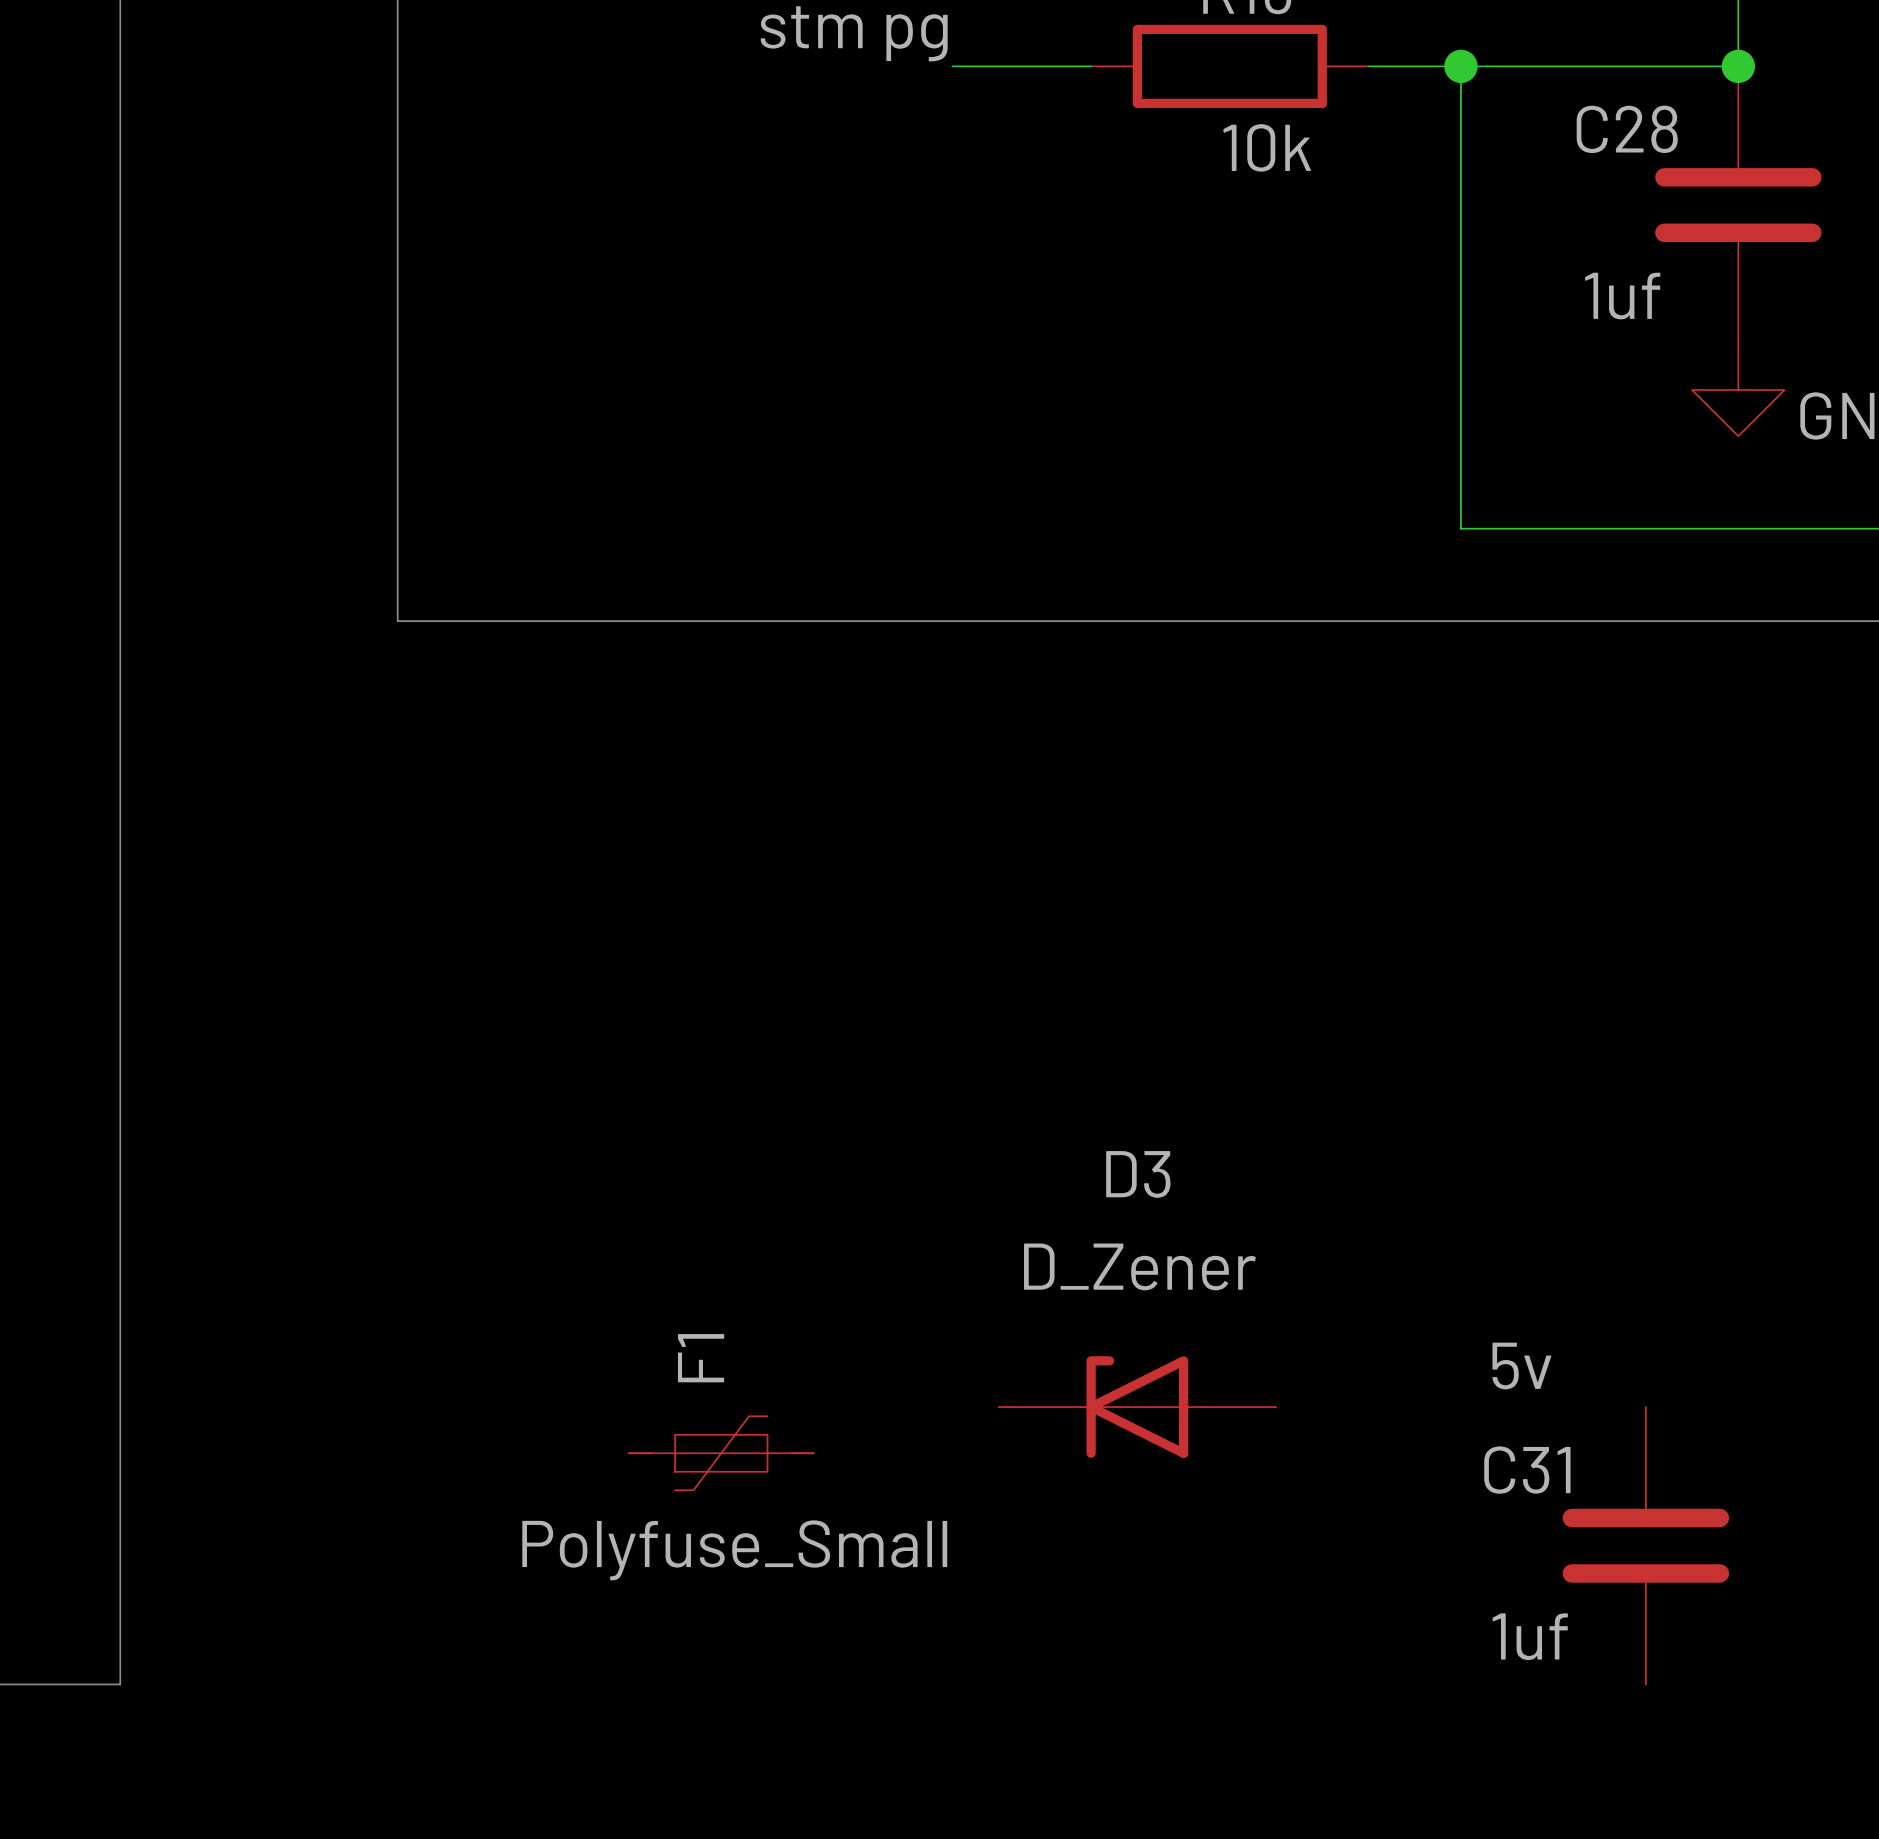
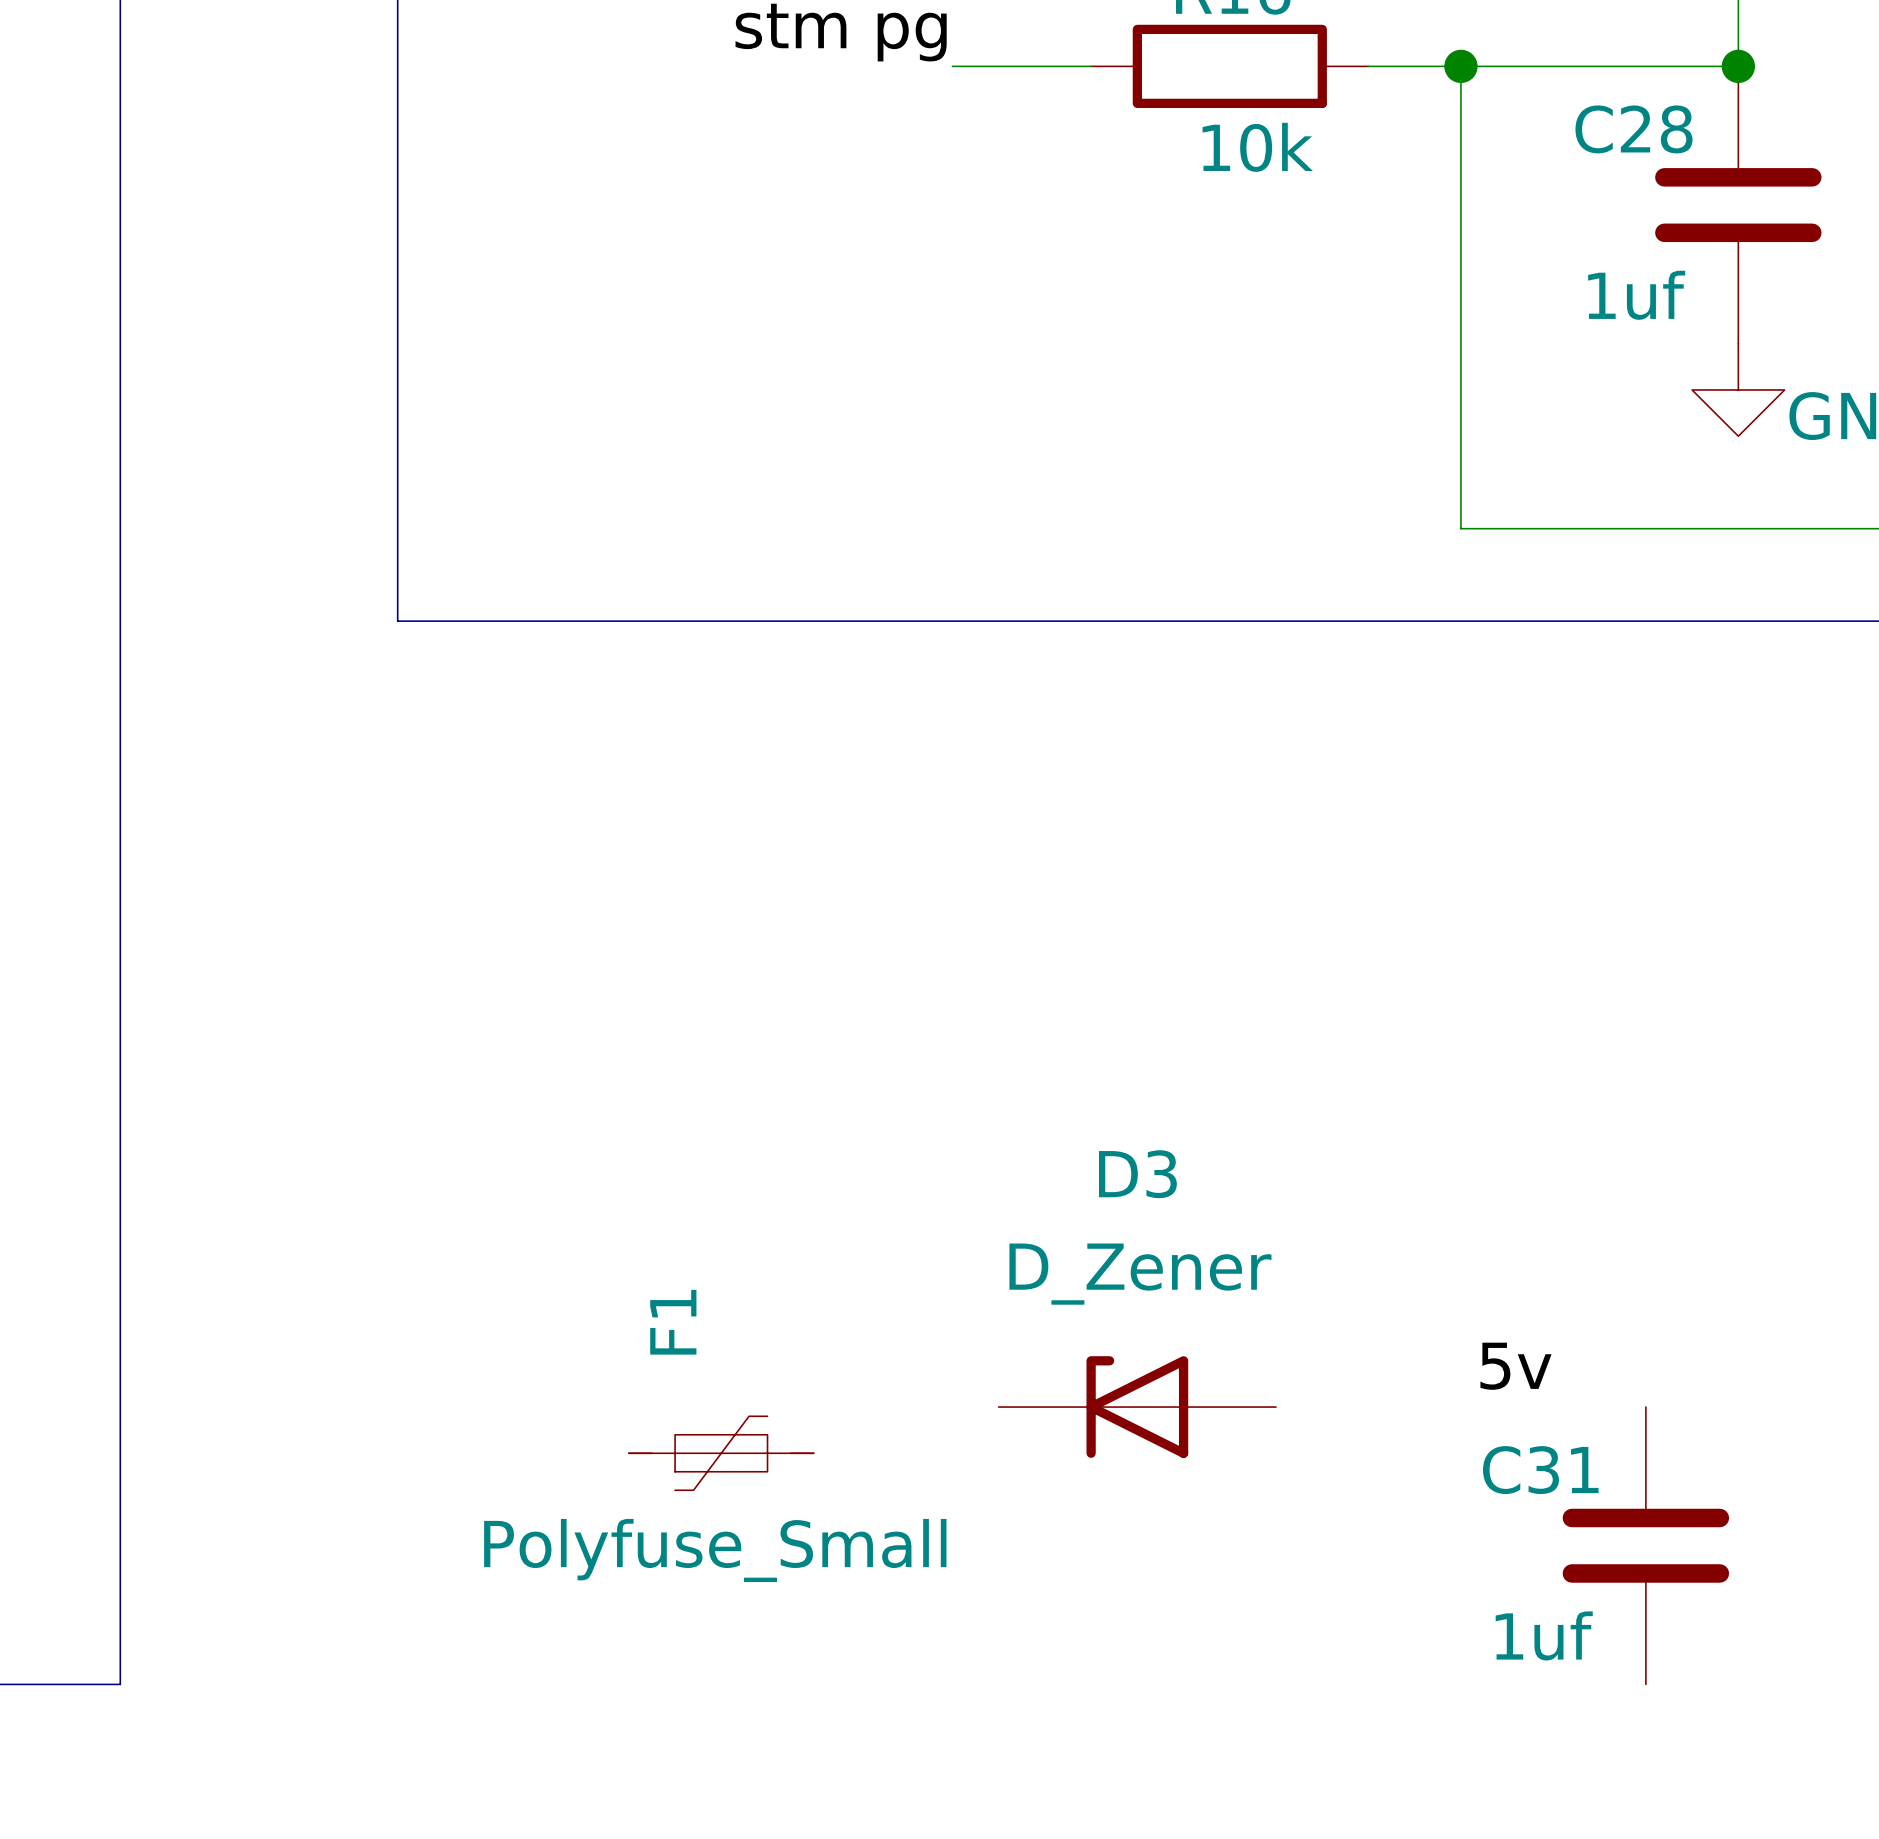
F1 name position: F1 (701, 1358) -> F1 (673, 1322)

